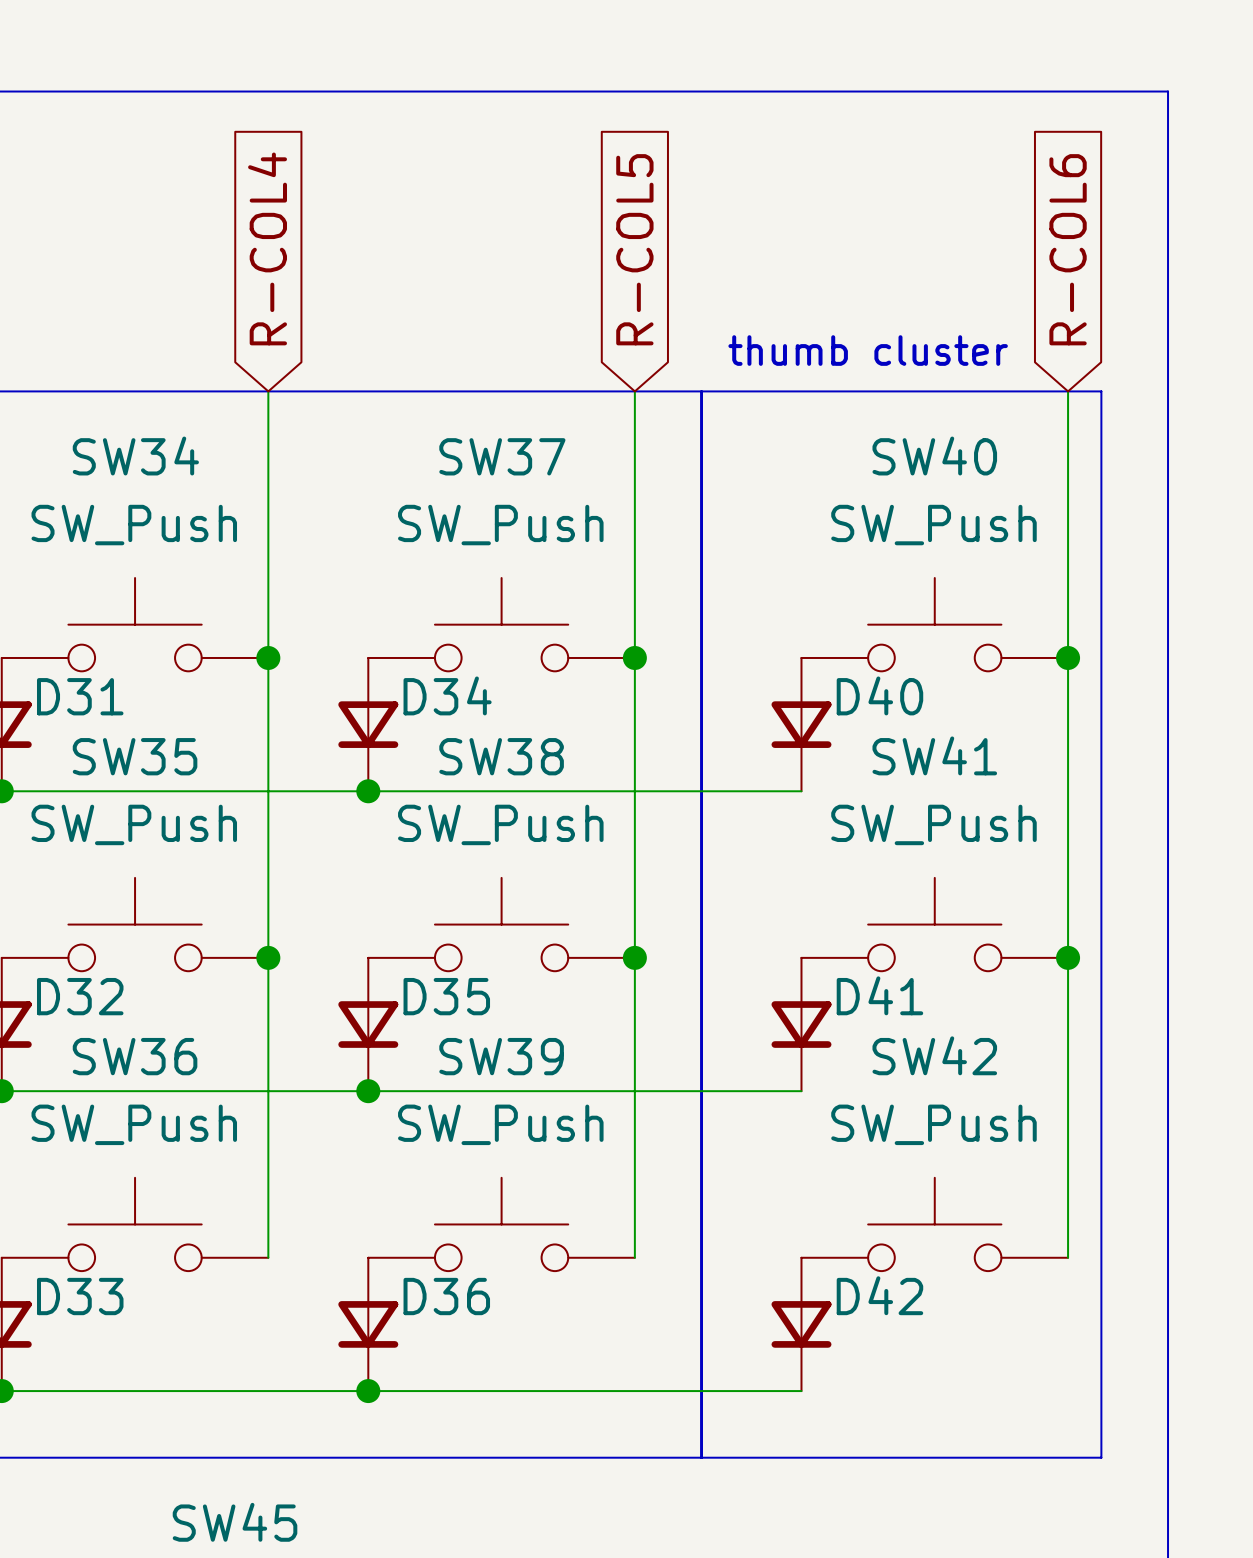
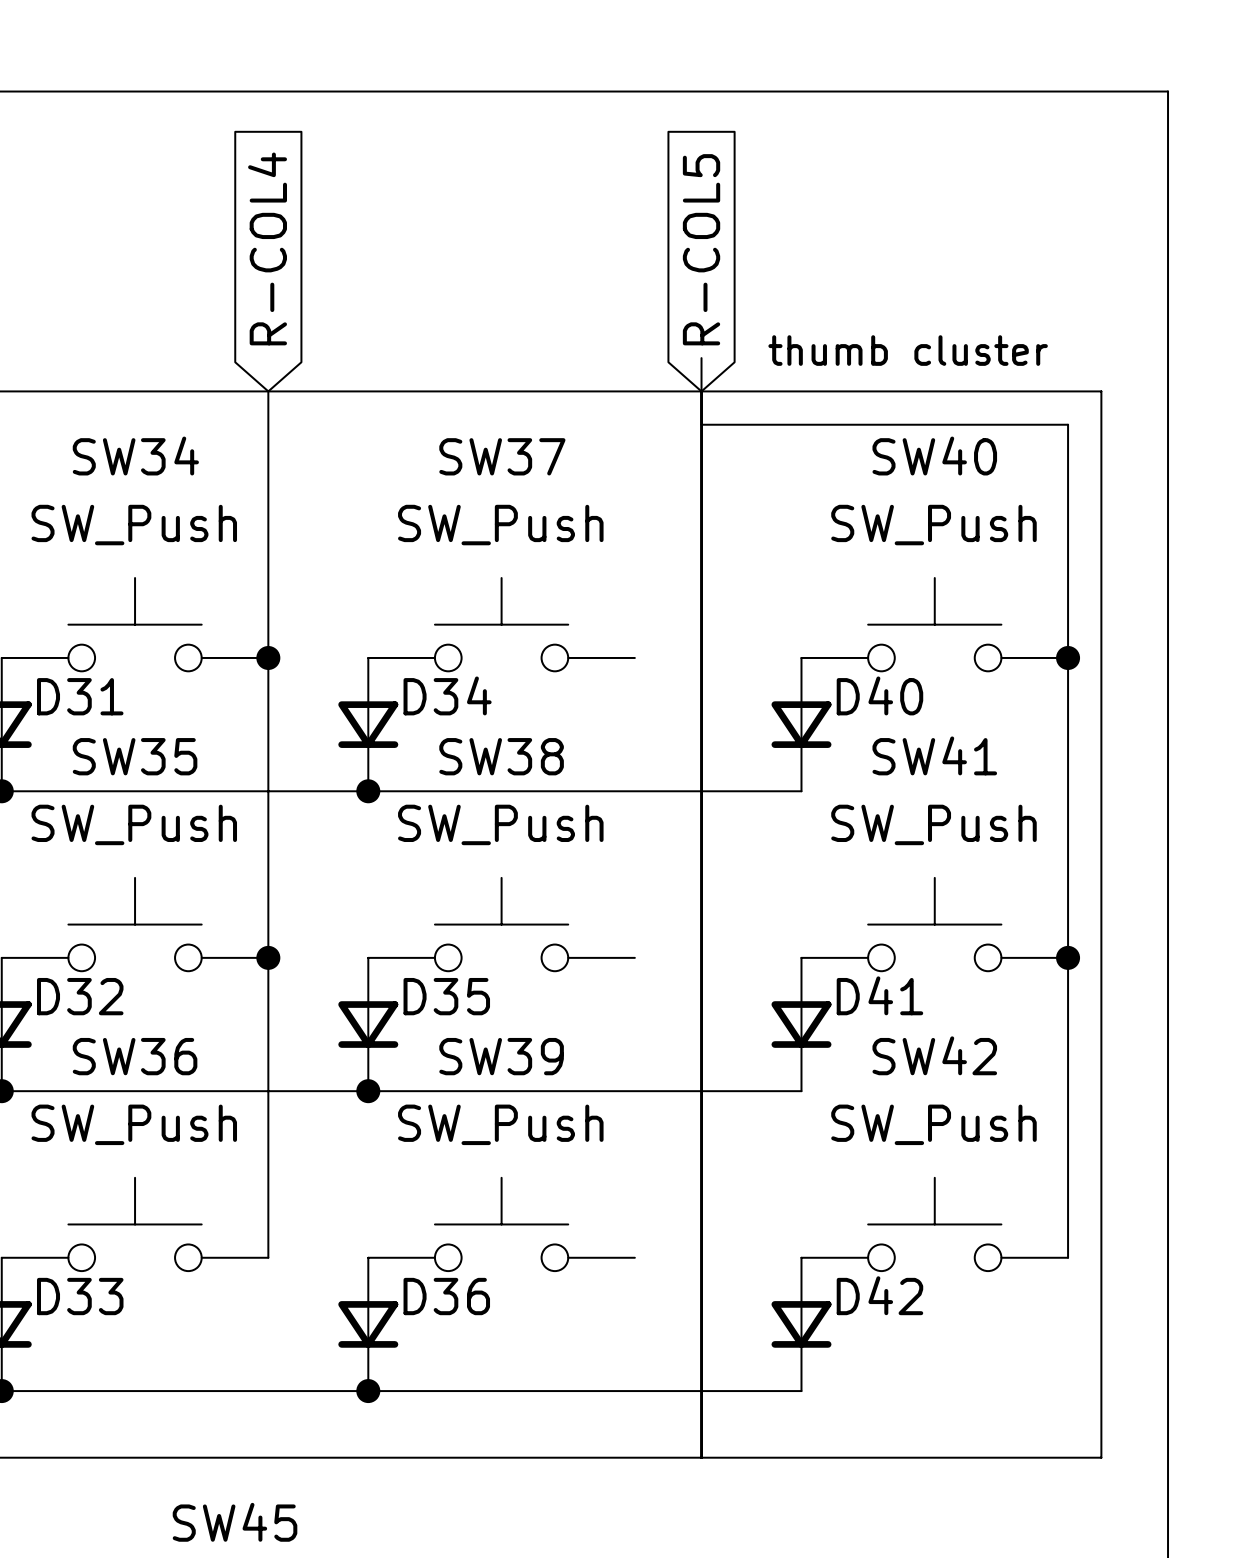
global label position: R-COL5 (634, 249) -> R-COL5 (701, 249)
global label: R-COL6 (1068, 249) -> none
text position: thumb cluster (868, 350) -> thumb cluster (908, 350)
wire: (634, 391) (634, 1257) -> none
wire: (1068, 391) (1068, 424) -> (701, 358) (701, 424) (1068, 424)
junction: (634, 657) -> none
junction: (634, 957) -> none

